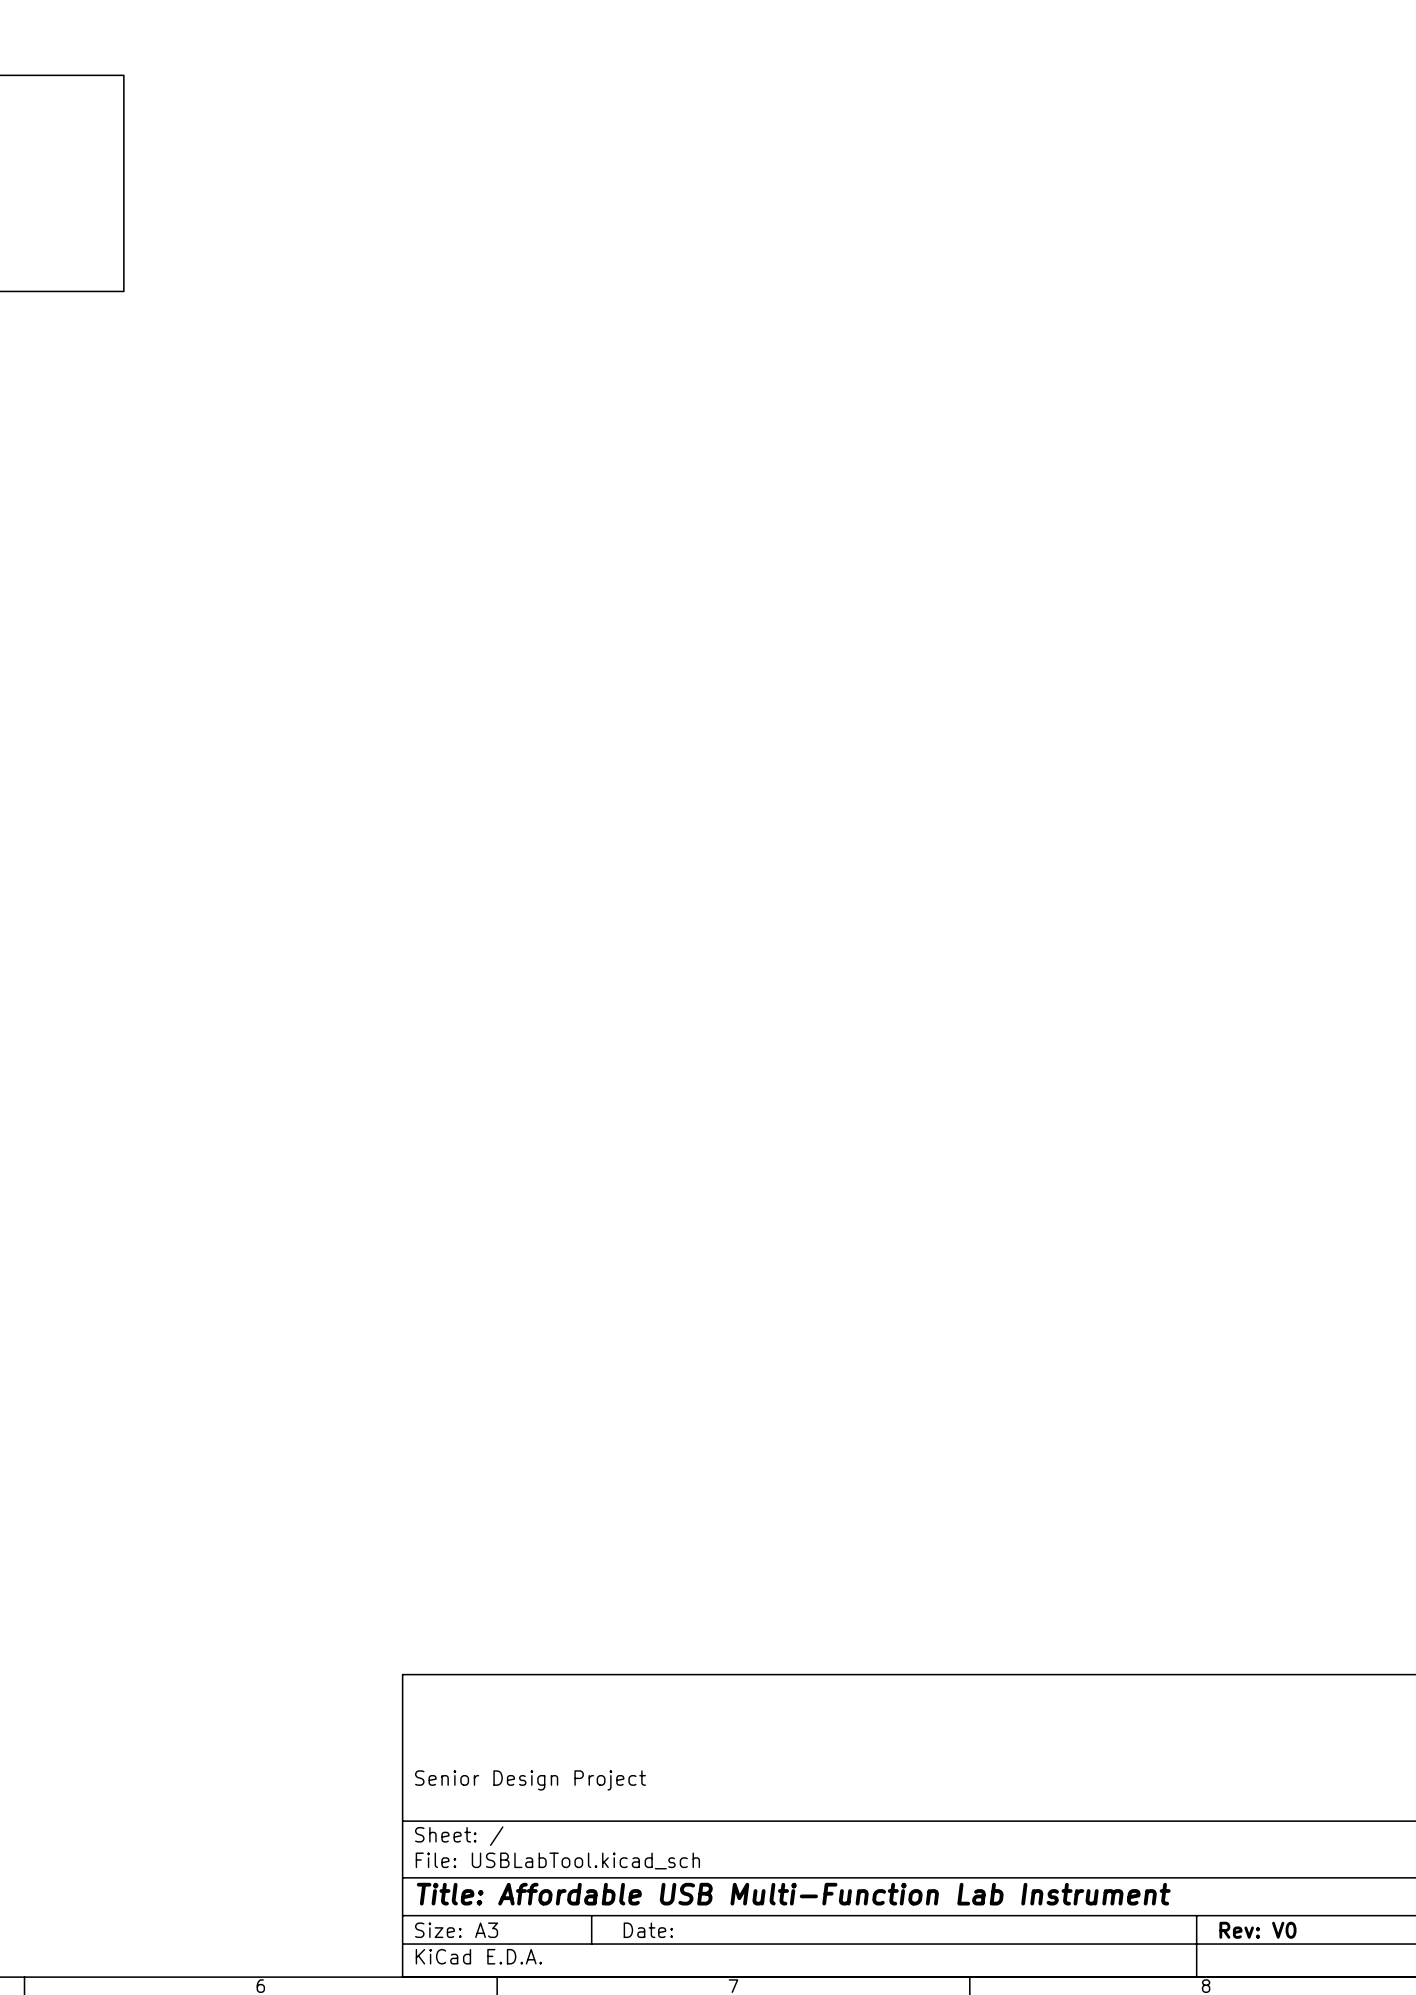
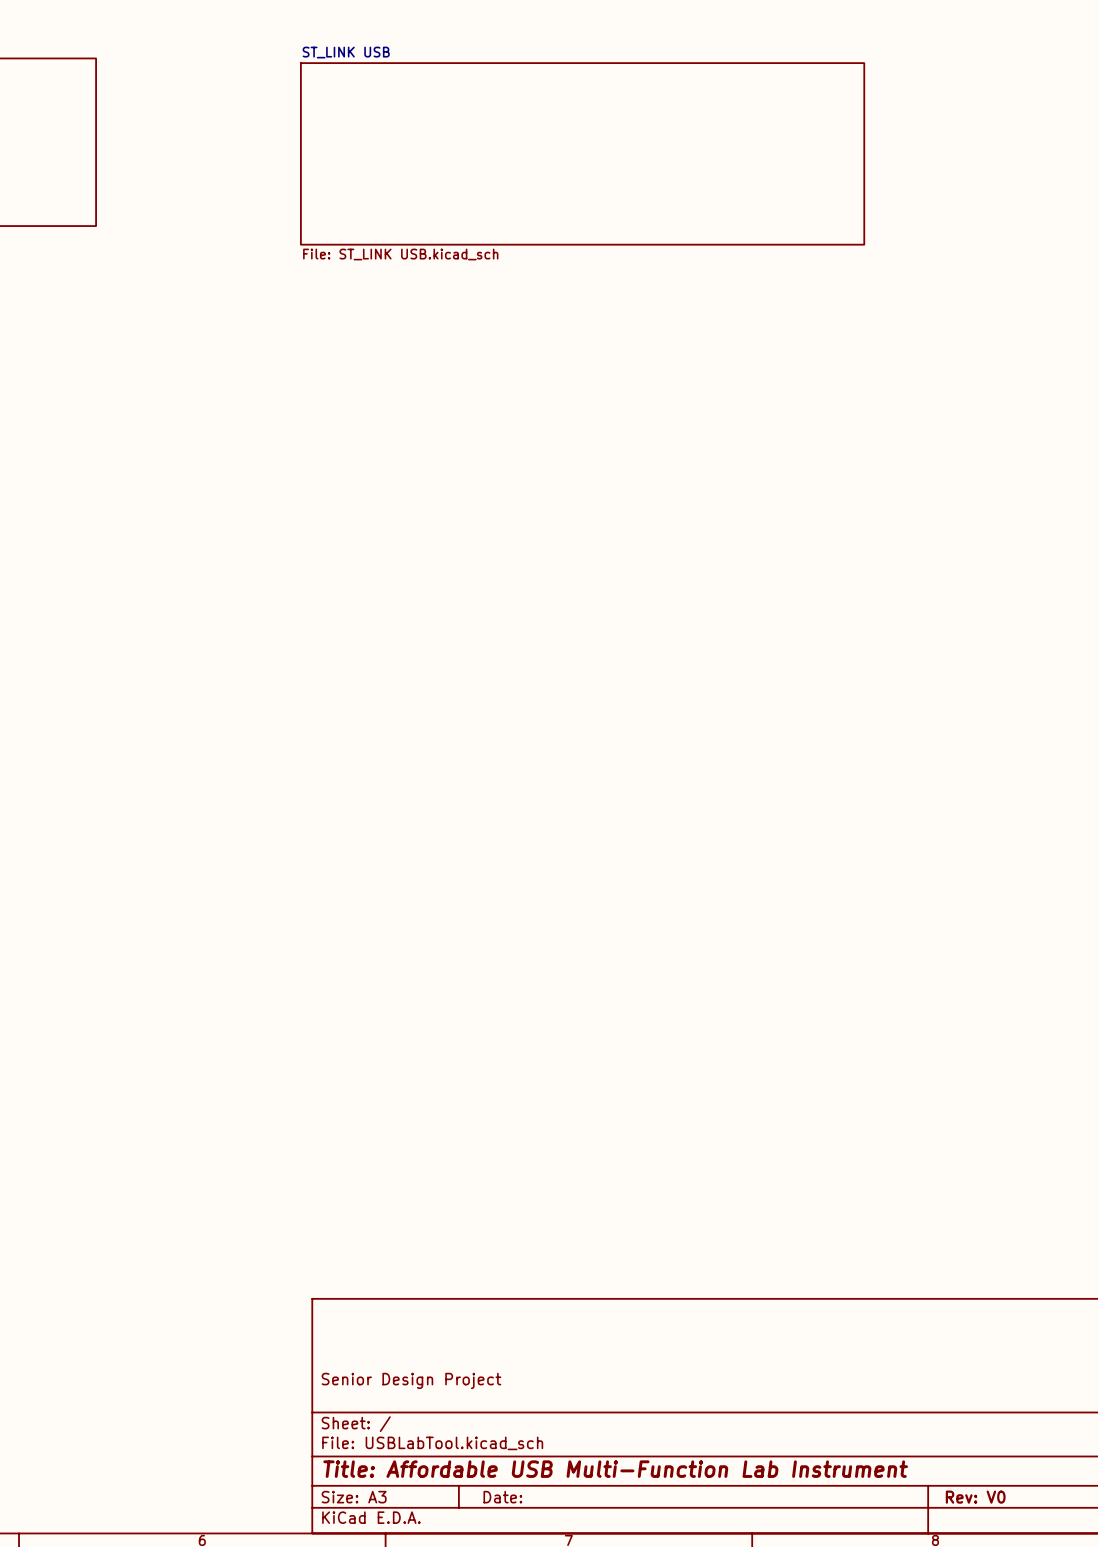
sheet ST_LINK USB: none -> File: ST_LINK USB.kicad_sch (582, 153)

